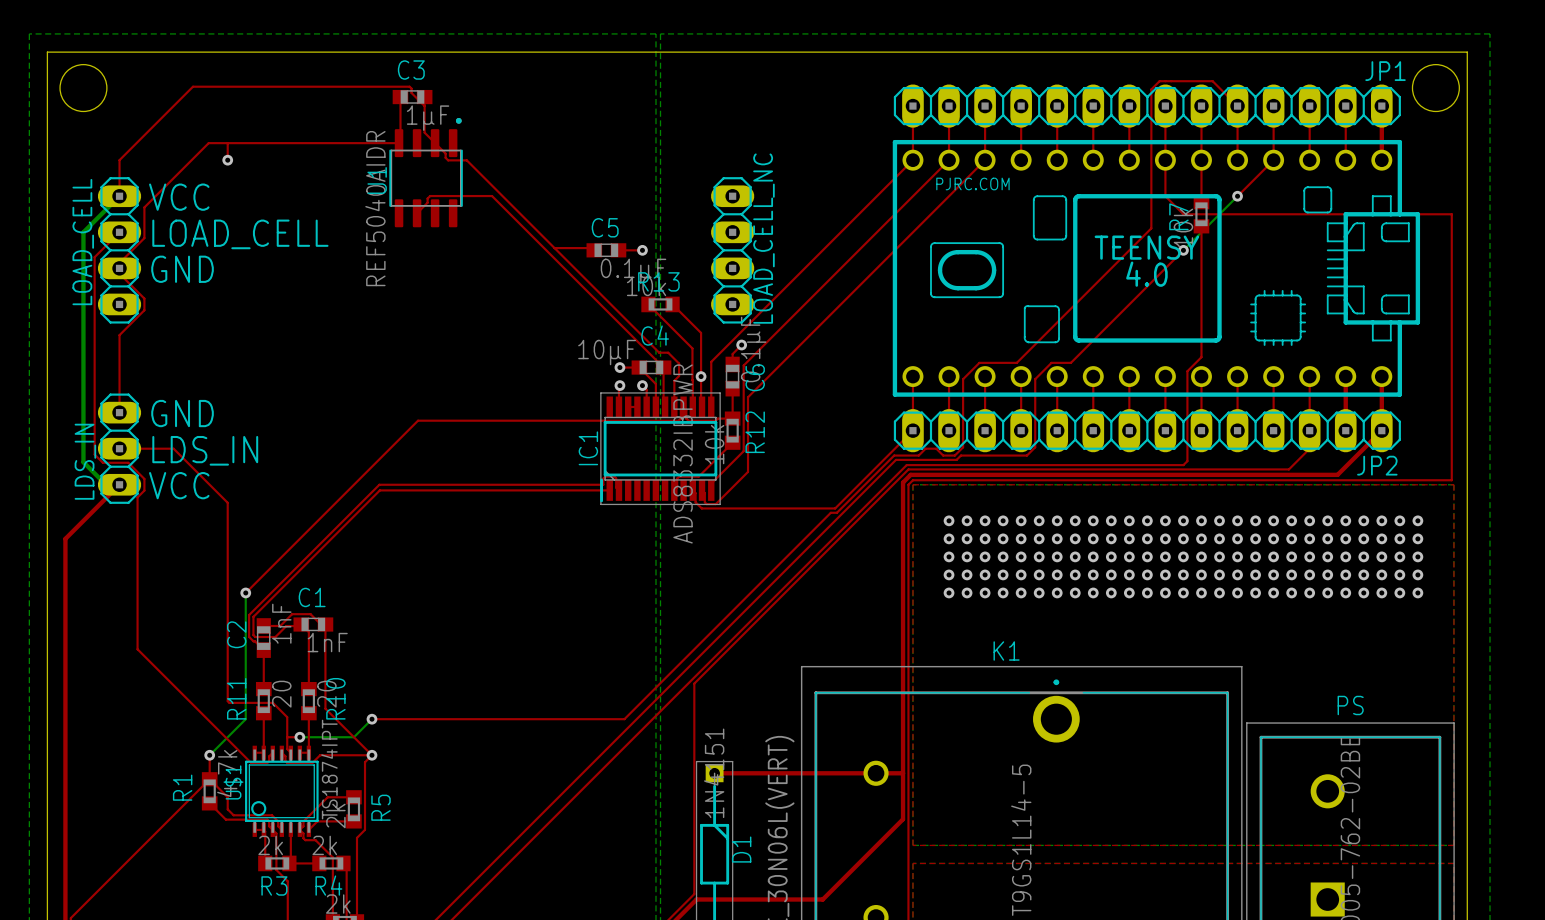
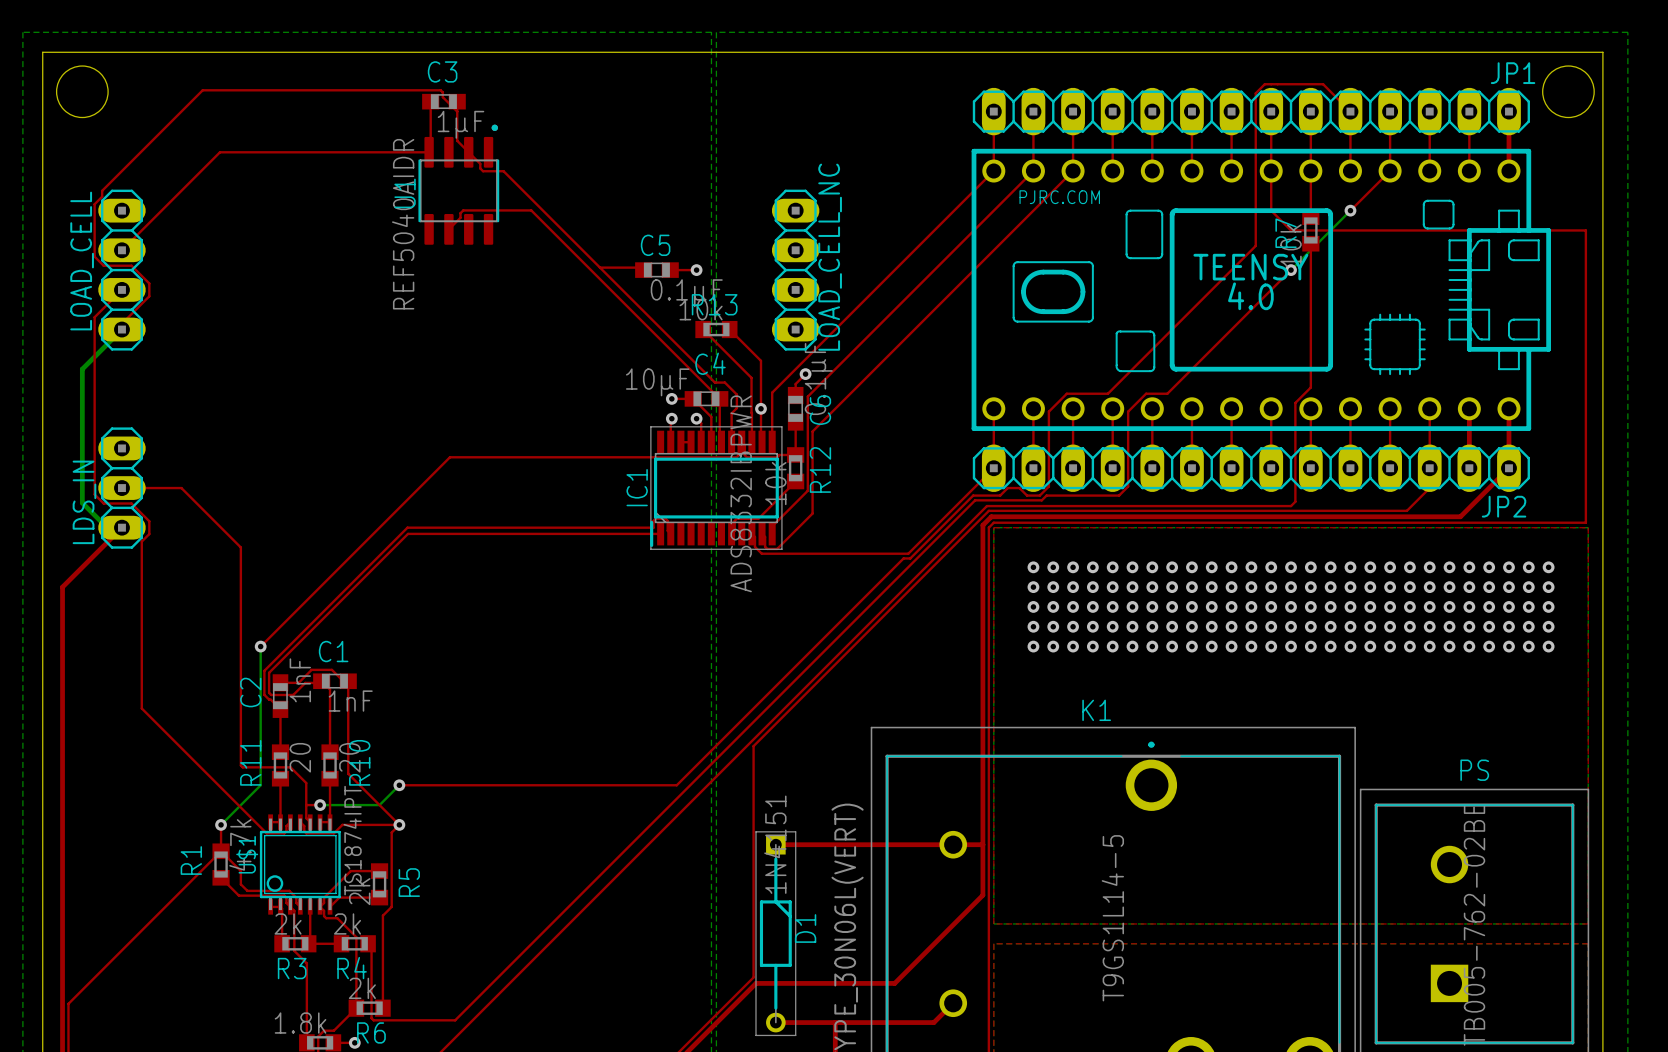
top track: (227, 143) (227, 160) -> none
top track: (119, 160) (119, 196) -> (121, 171) (102, 190) (102, 196) (94, 204) (94, 256) (103, 265) (131, 265) (149, 283) (149, 296) (121, 323) (121, 329)
via: (227, 160) -> none
bottom track: (119, 196) (83, 232) (83, 340) -> (121, 329) (82, 369)
text: VCC (179, 197) -> none
top track: (144, 207) (144, 238) (119, 263) (119, 273) (144, 298) (144, 310) (119, 335) (119, 412) -> (149, 222) (121, 250)
top track: (119, 232) (94, 257) (94, 293) -> (121, 289) (94, 317)
text: LOAD_CELL (240, 234) -> none
text: GND (182, 269) -> none
text: GND (182, 413) -> none
text: LDS_IN (205, 450) -> none
text: VCC (179, 485) -> none

